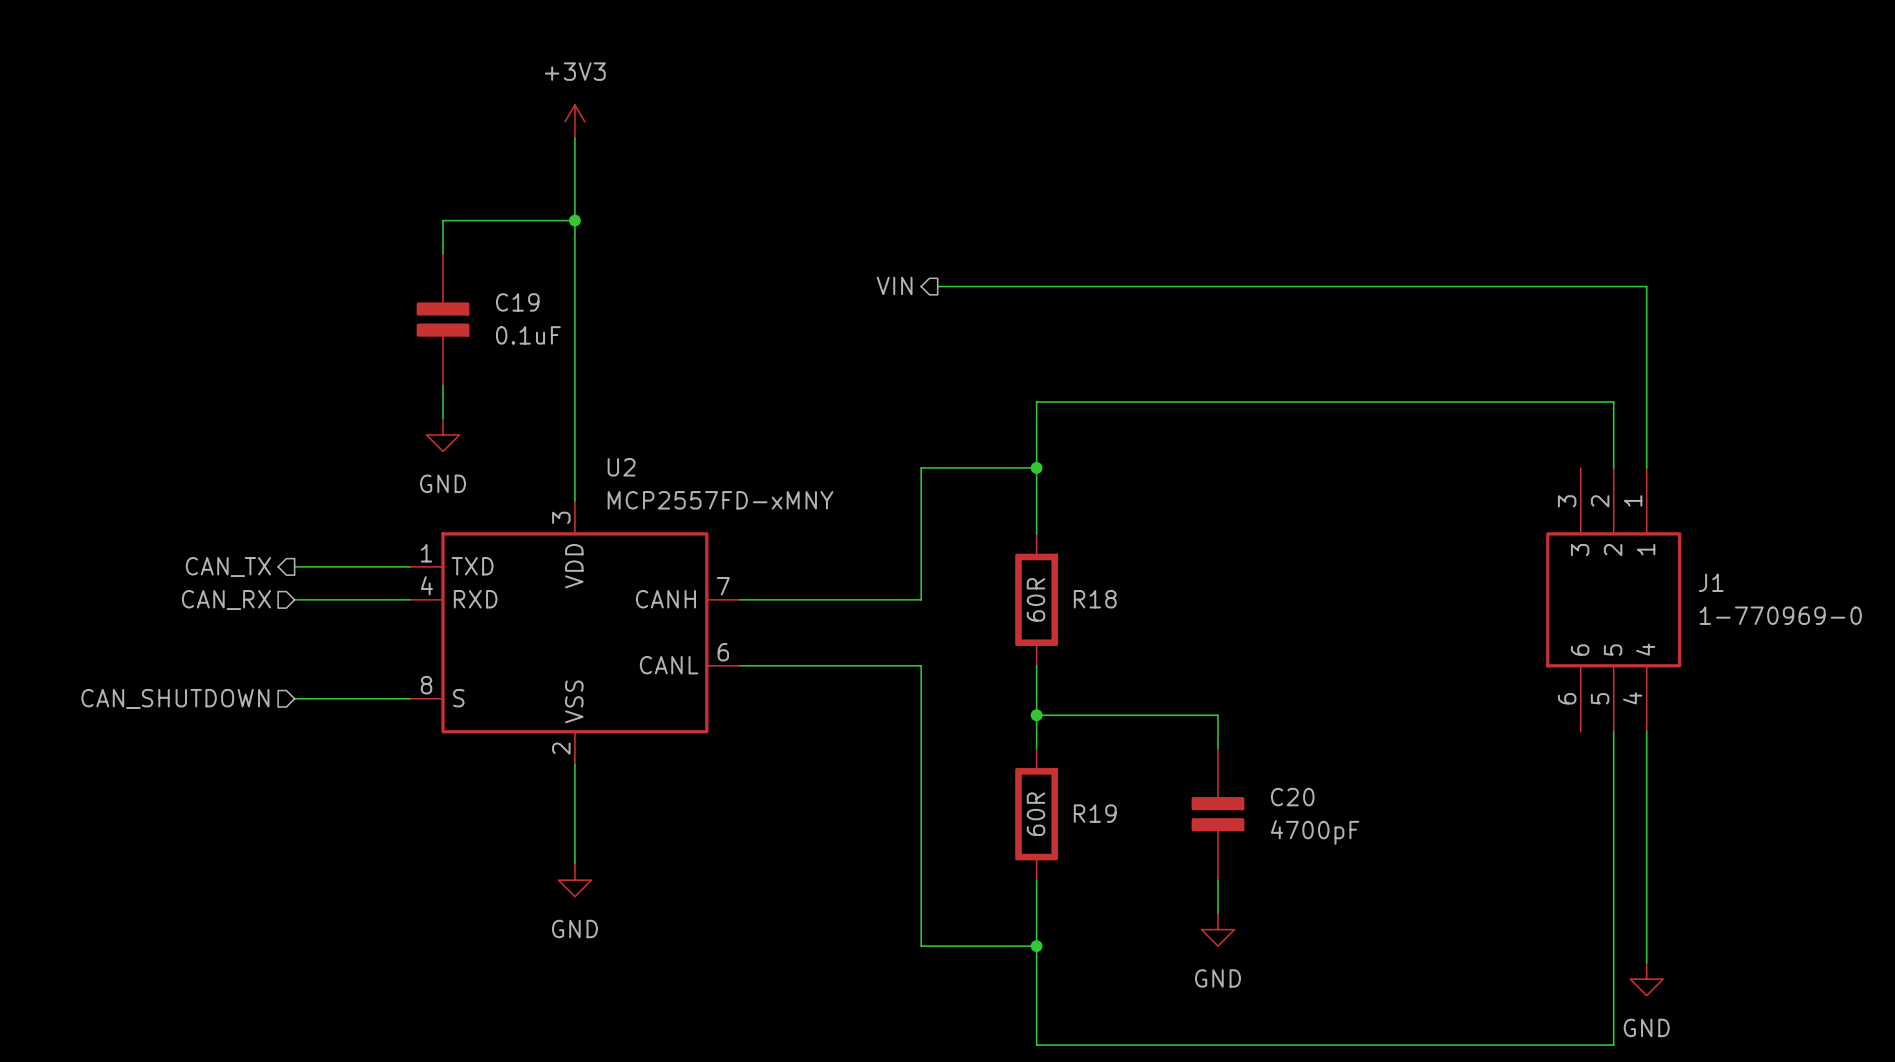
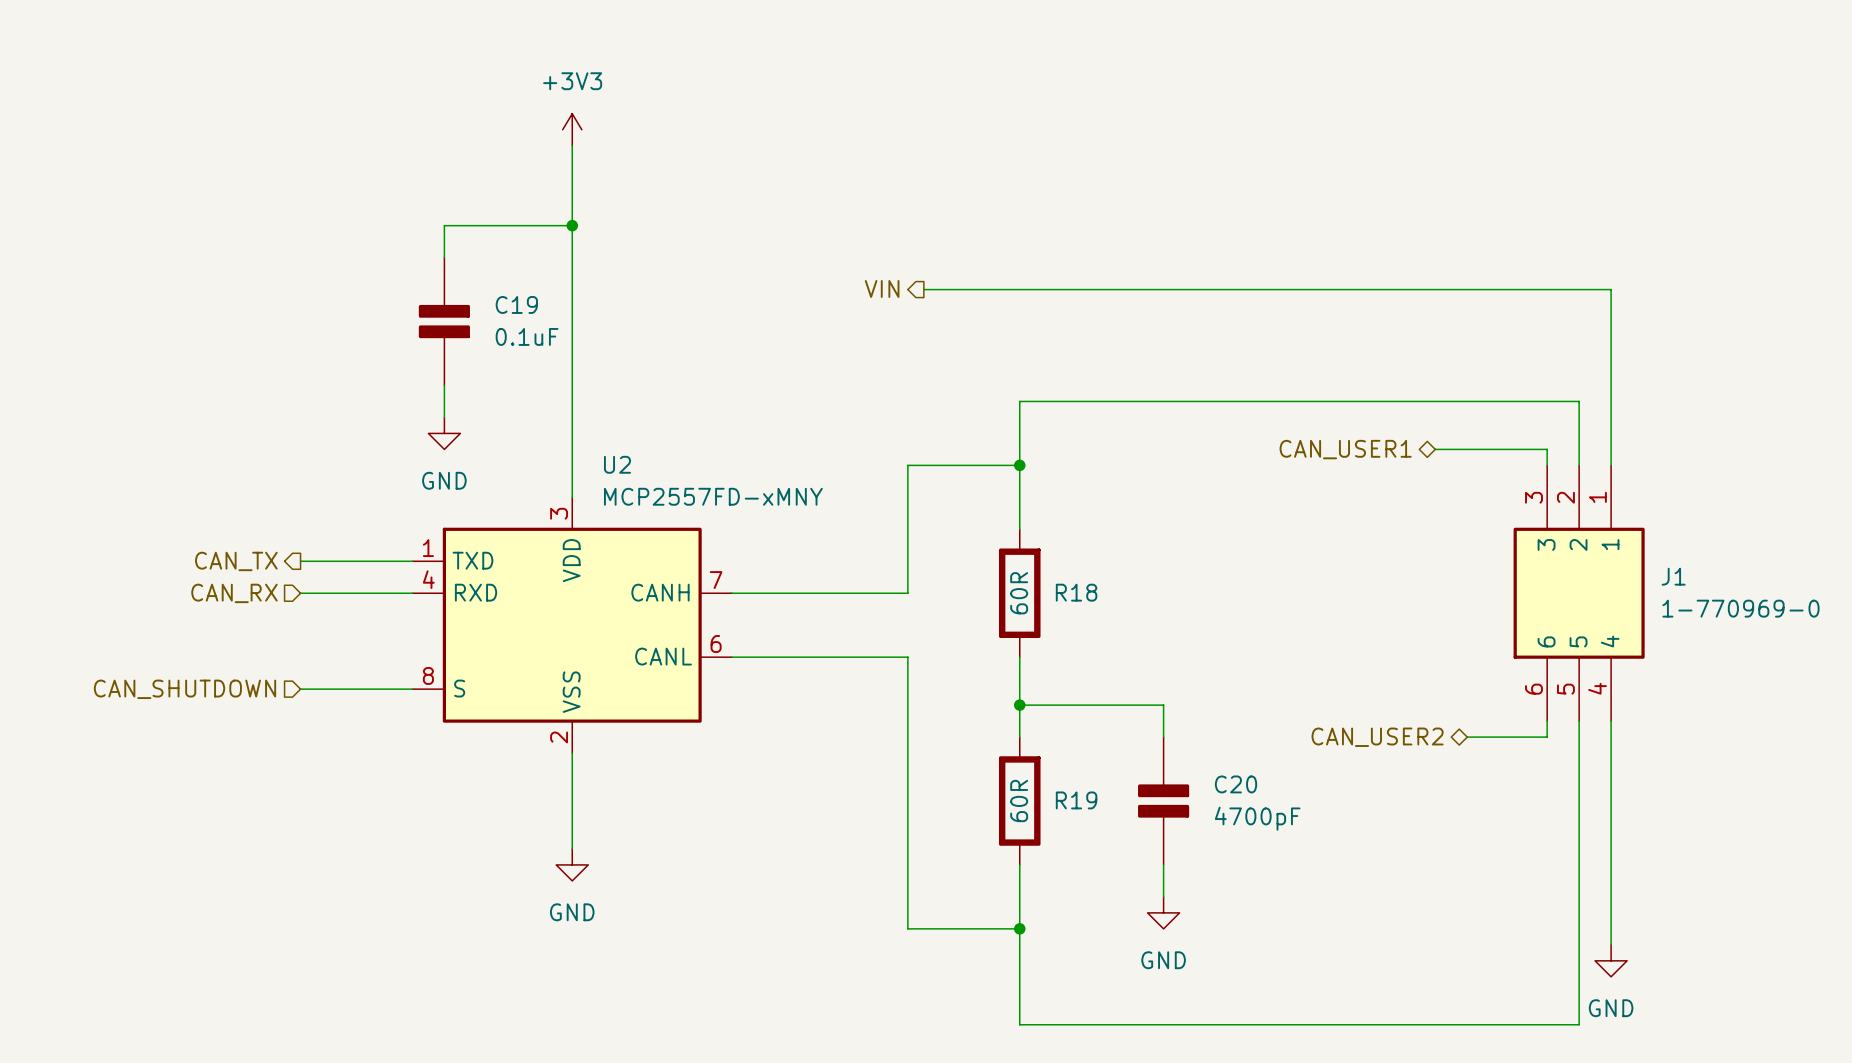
hierarchical label: none -> CAN_USER1 (1345, 449)
wire: none -> (1435, 449) (1547, 449) (1547, 465)
wire: (1185, 715) (1217, 715) (1217, 748) -> (1163, 705) (1163, 737)
wire: none -> (1547, 721) (1547, 737) (1467, 737)
hierarchical label: none -> CAN_USER2 (1377, 737)
C20 position: (1217, 814) -> (1163, 801)
wire: (1217, 880) (1217, 913) -> (1163, 864) (1163, 896)
power symbol position: GND (1217, 929) -> GND (1163, 912)

